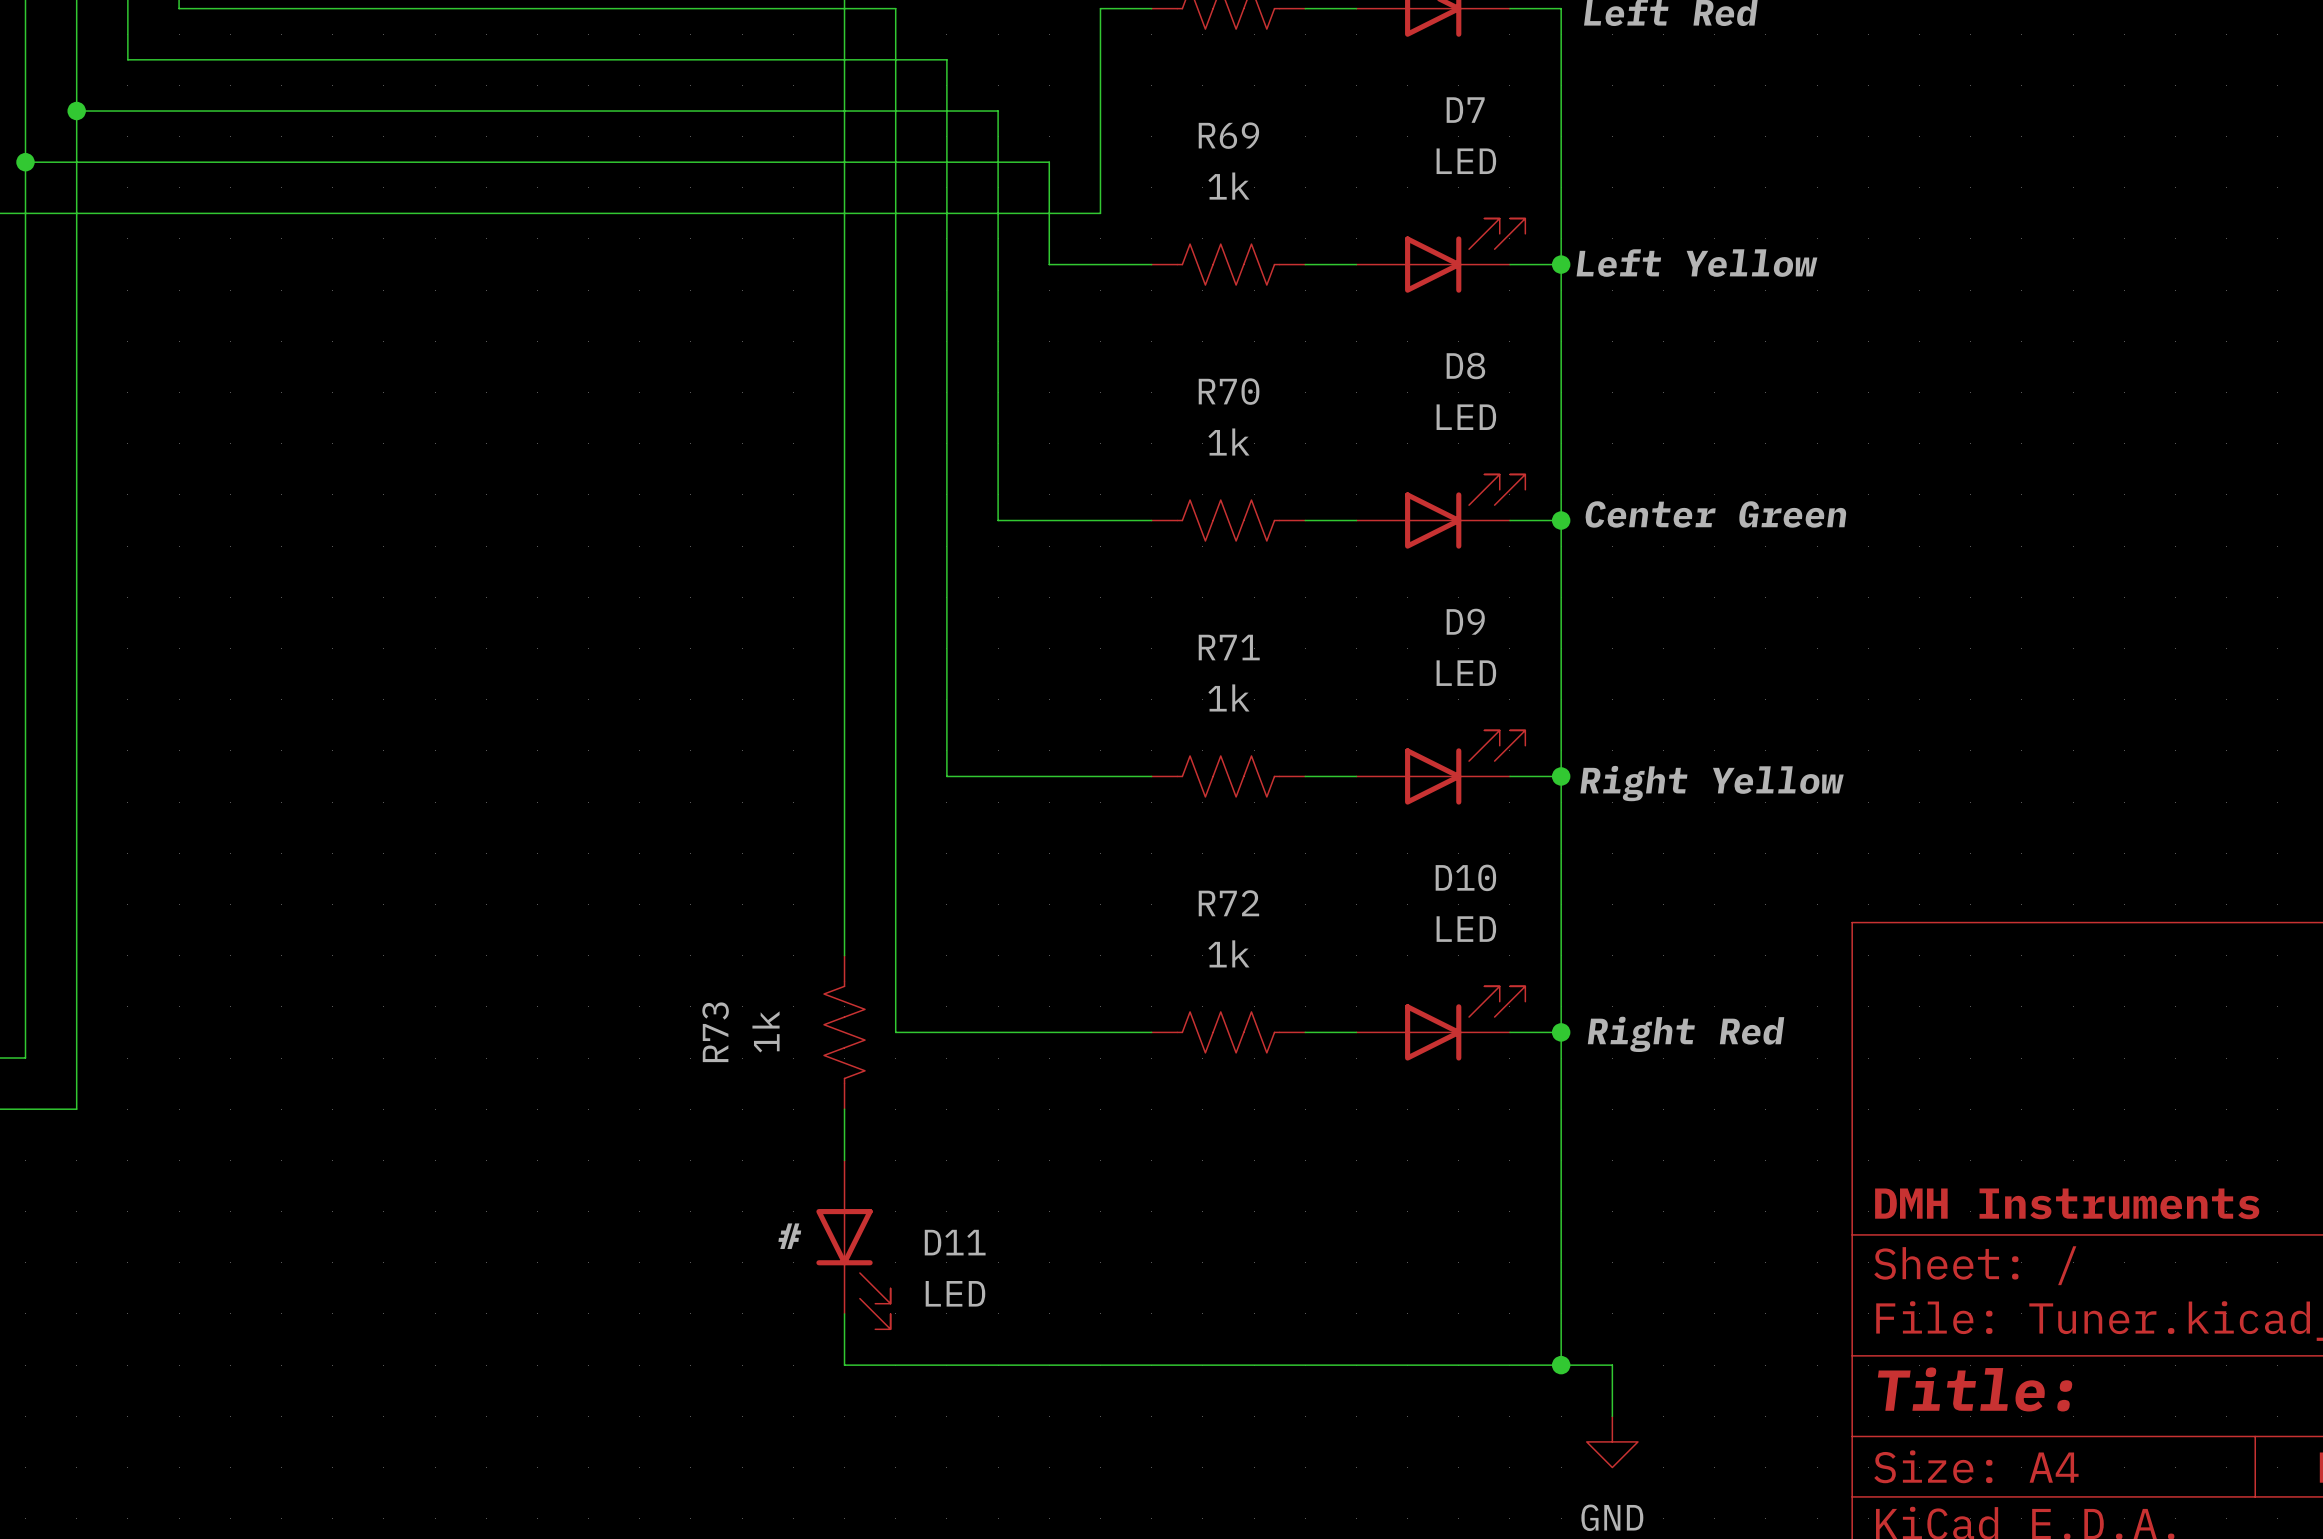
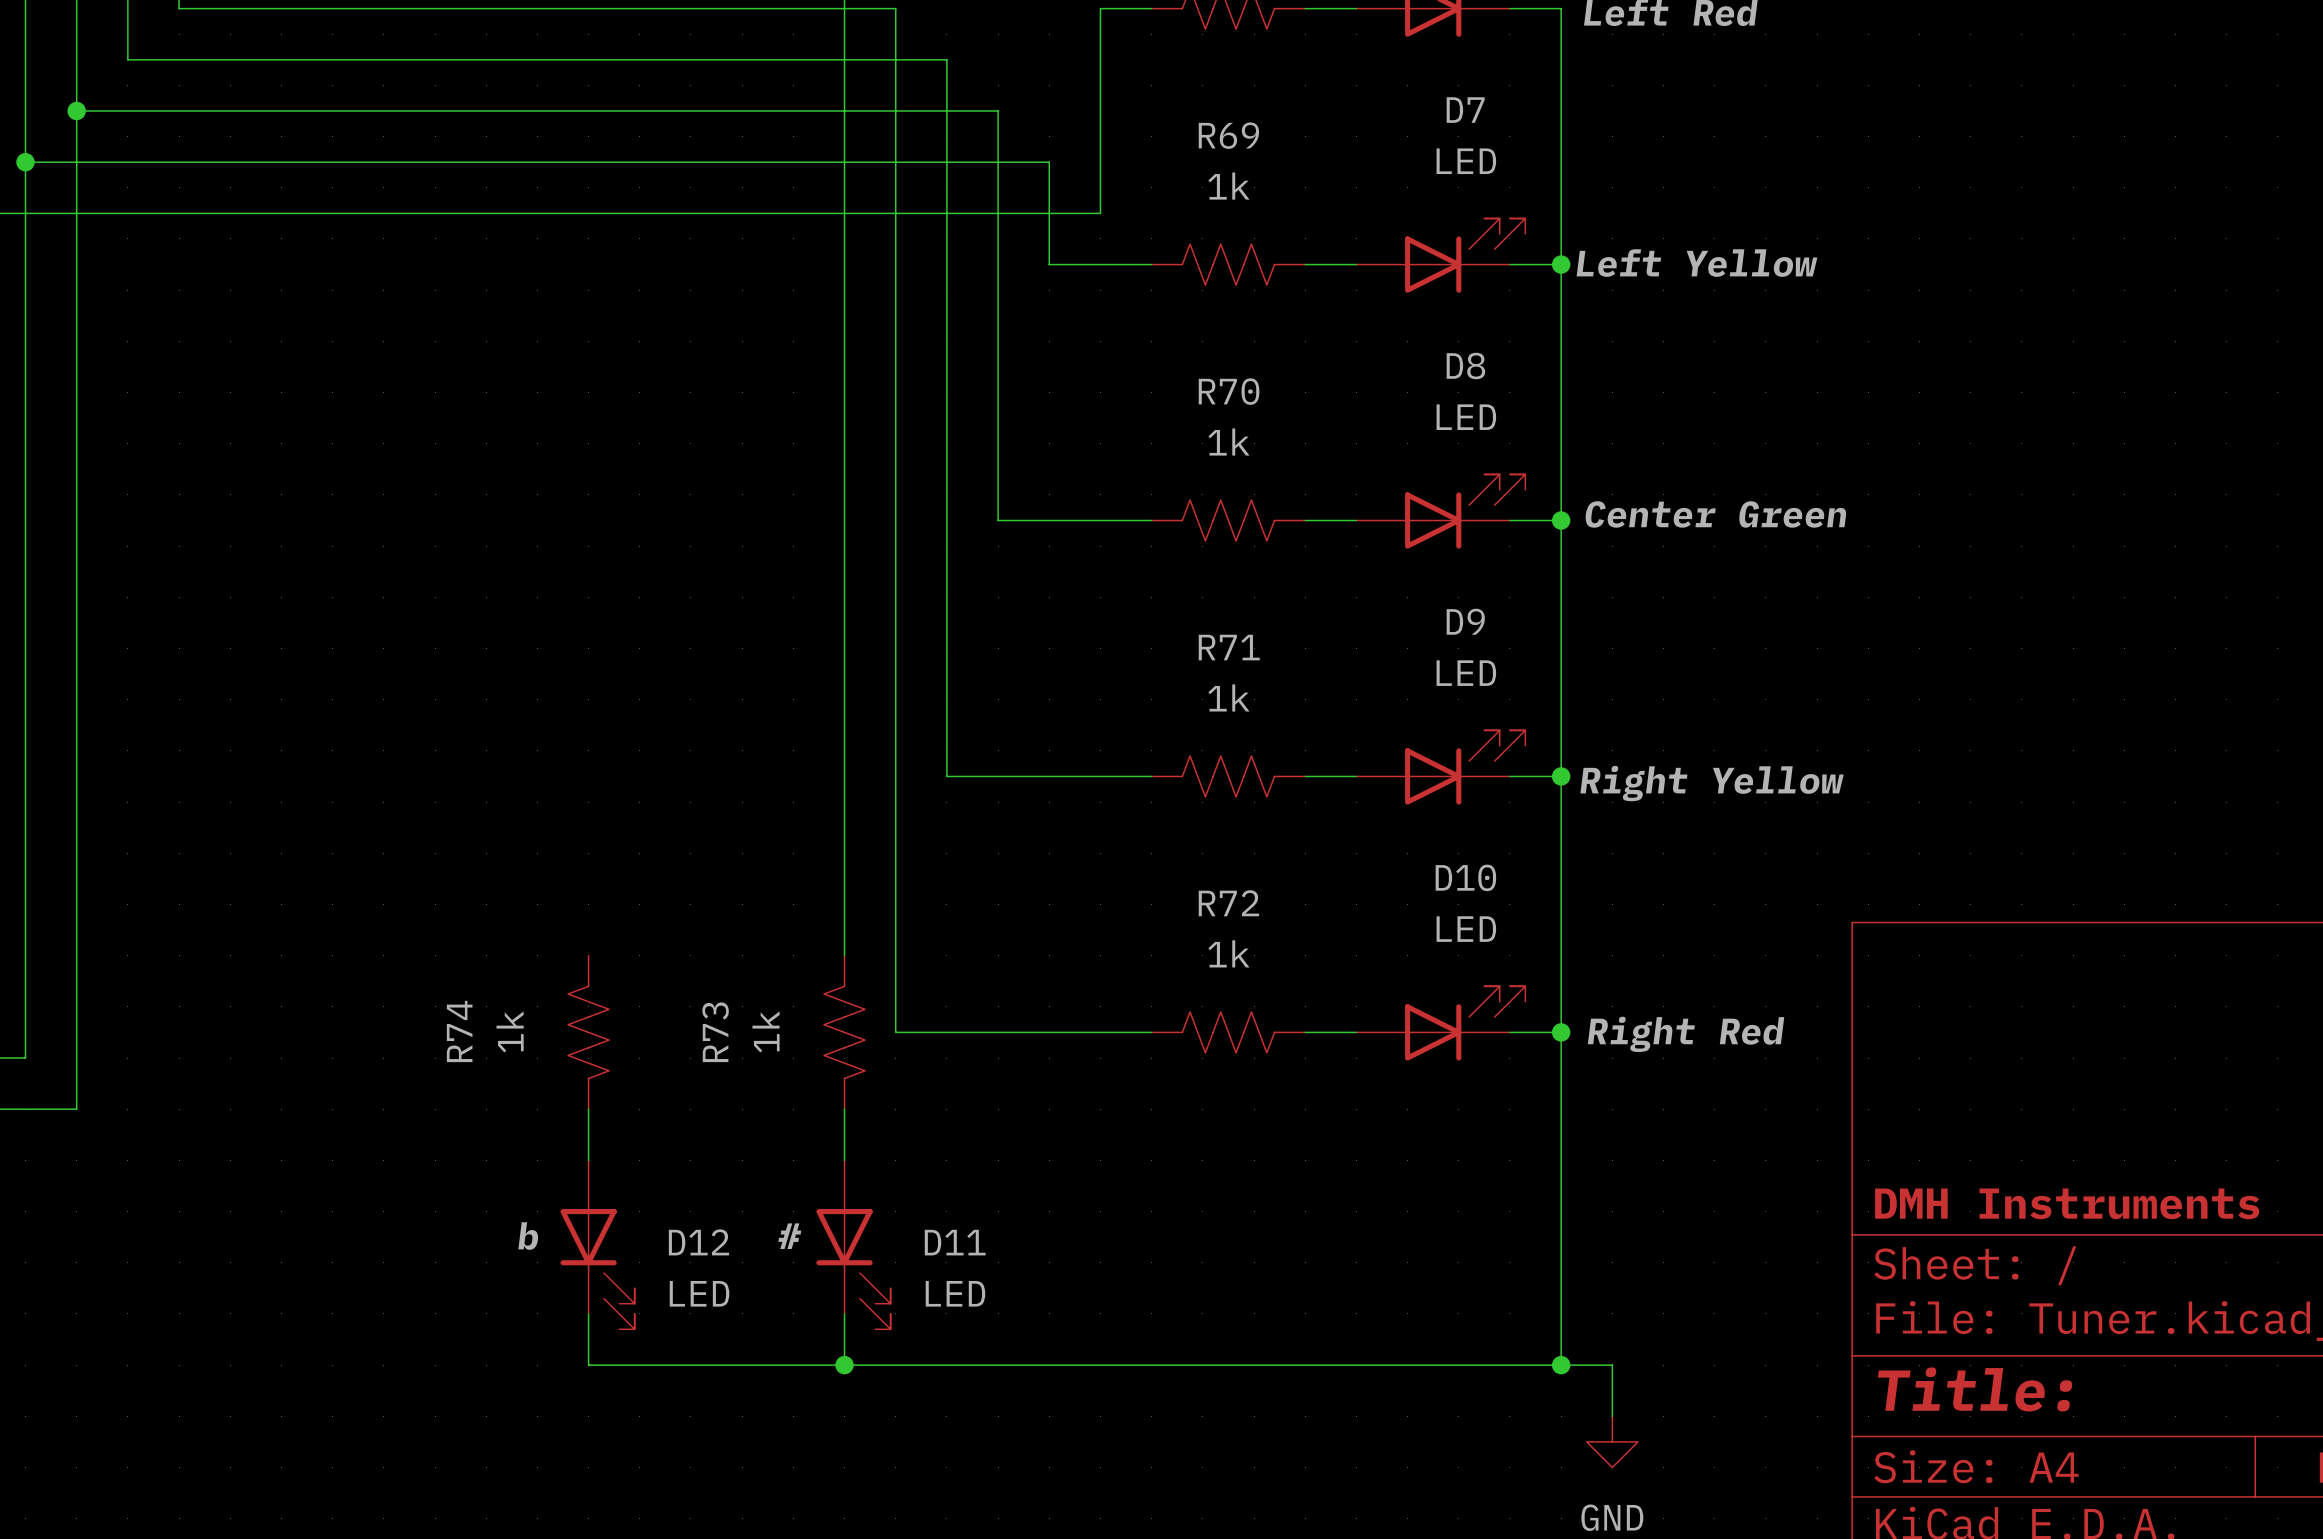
R74: none -> 1k (588, 1032)
wire: none -> (588, 1109) (588, 1160)
D12: none -> LED (597, 1244)
wire: none -> (588, 1313) (588, 1365) (844, 1365)
junction: none -> (844, 1365)

